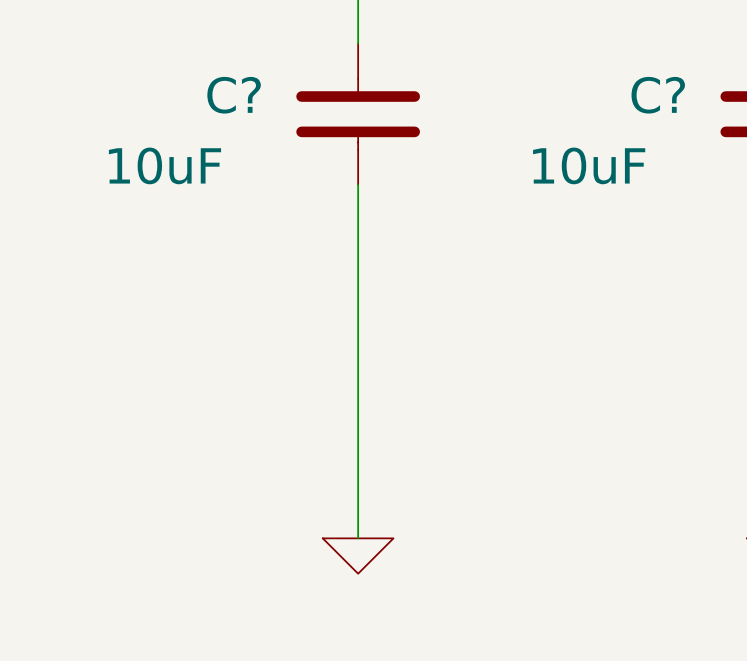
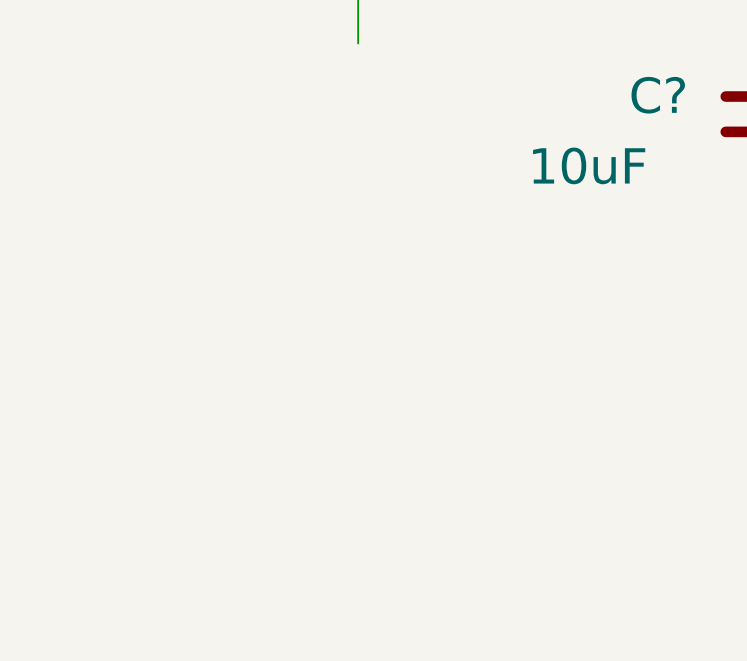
C?: 10uF (358, 114) -> none
wire: (358, 184) (358, 538) -> none
power symbol: (358, 556) -> none

